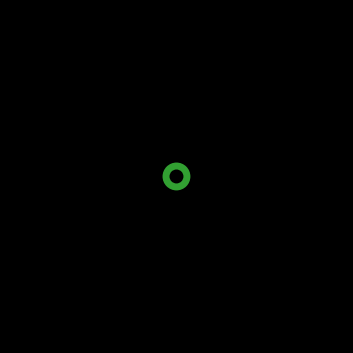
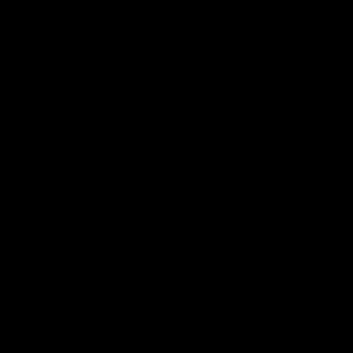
via: (176, 176) -> none

